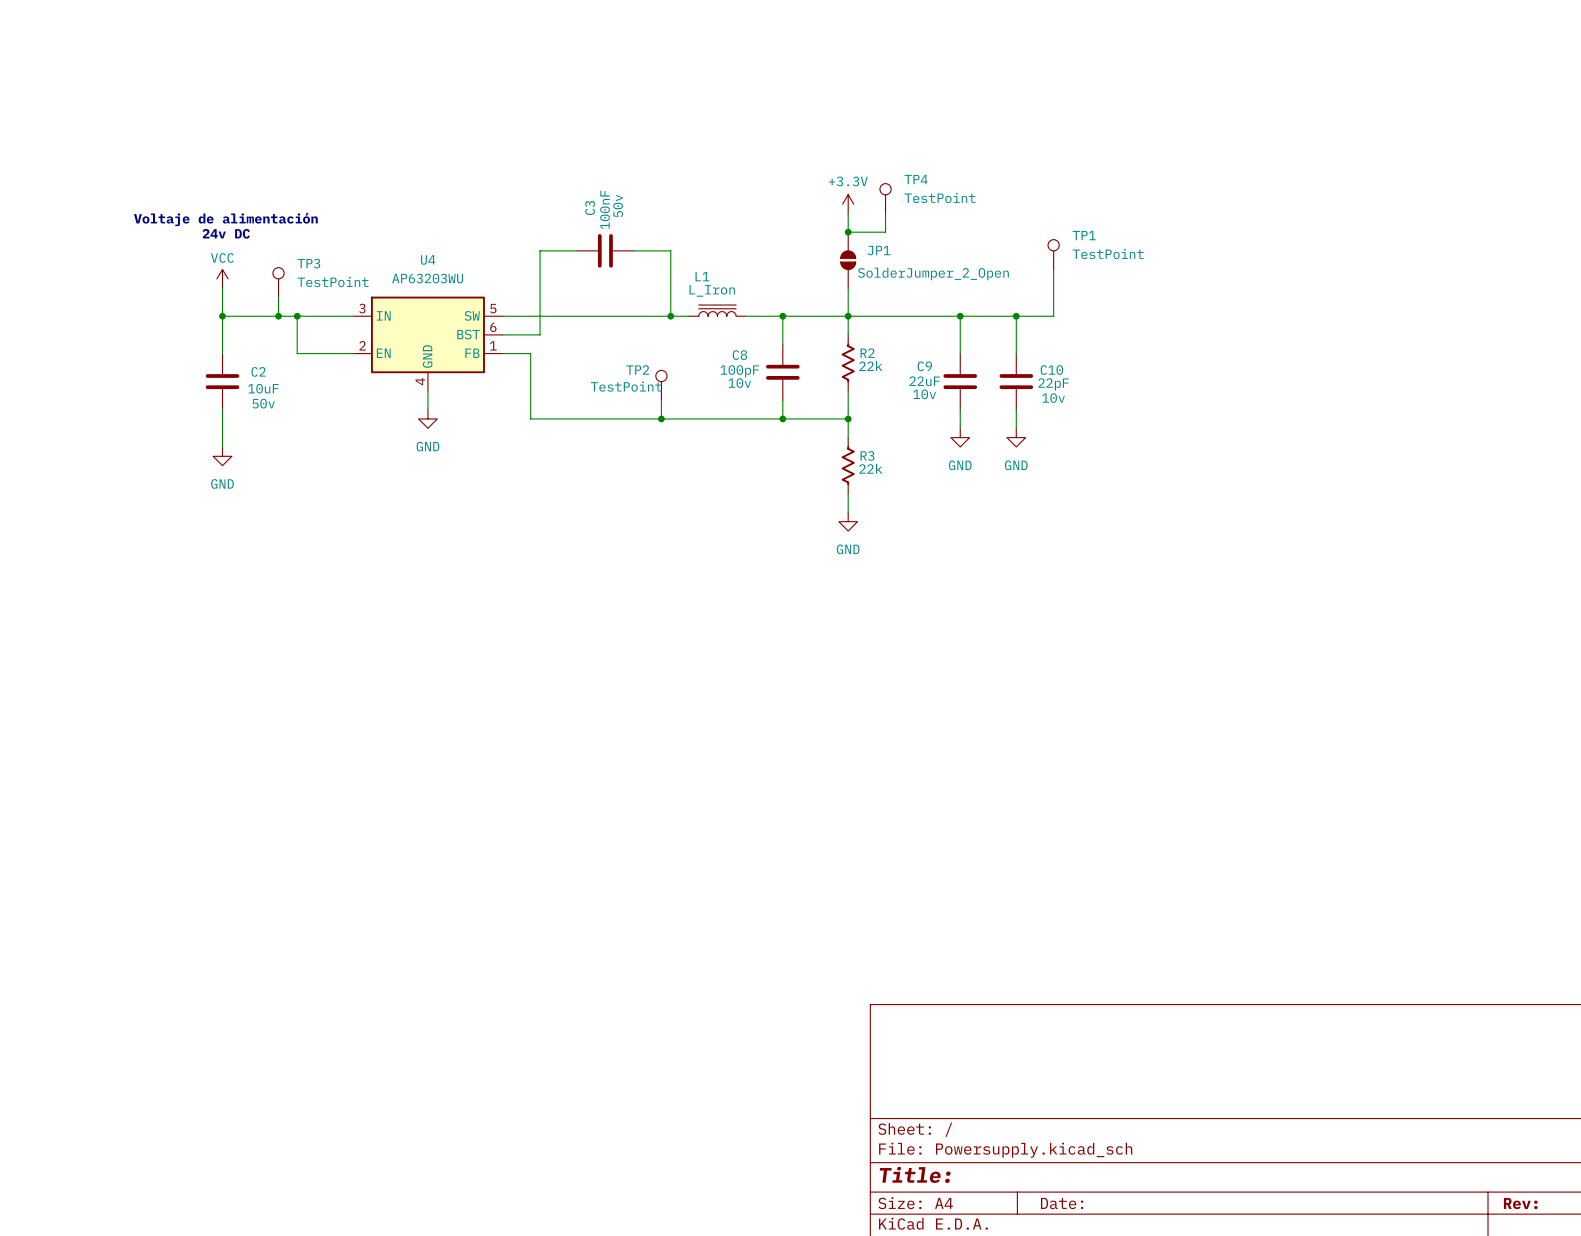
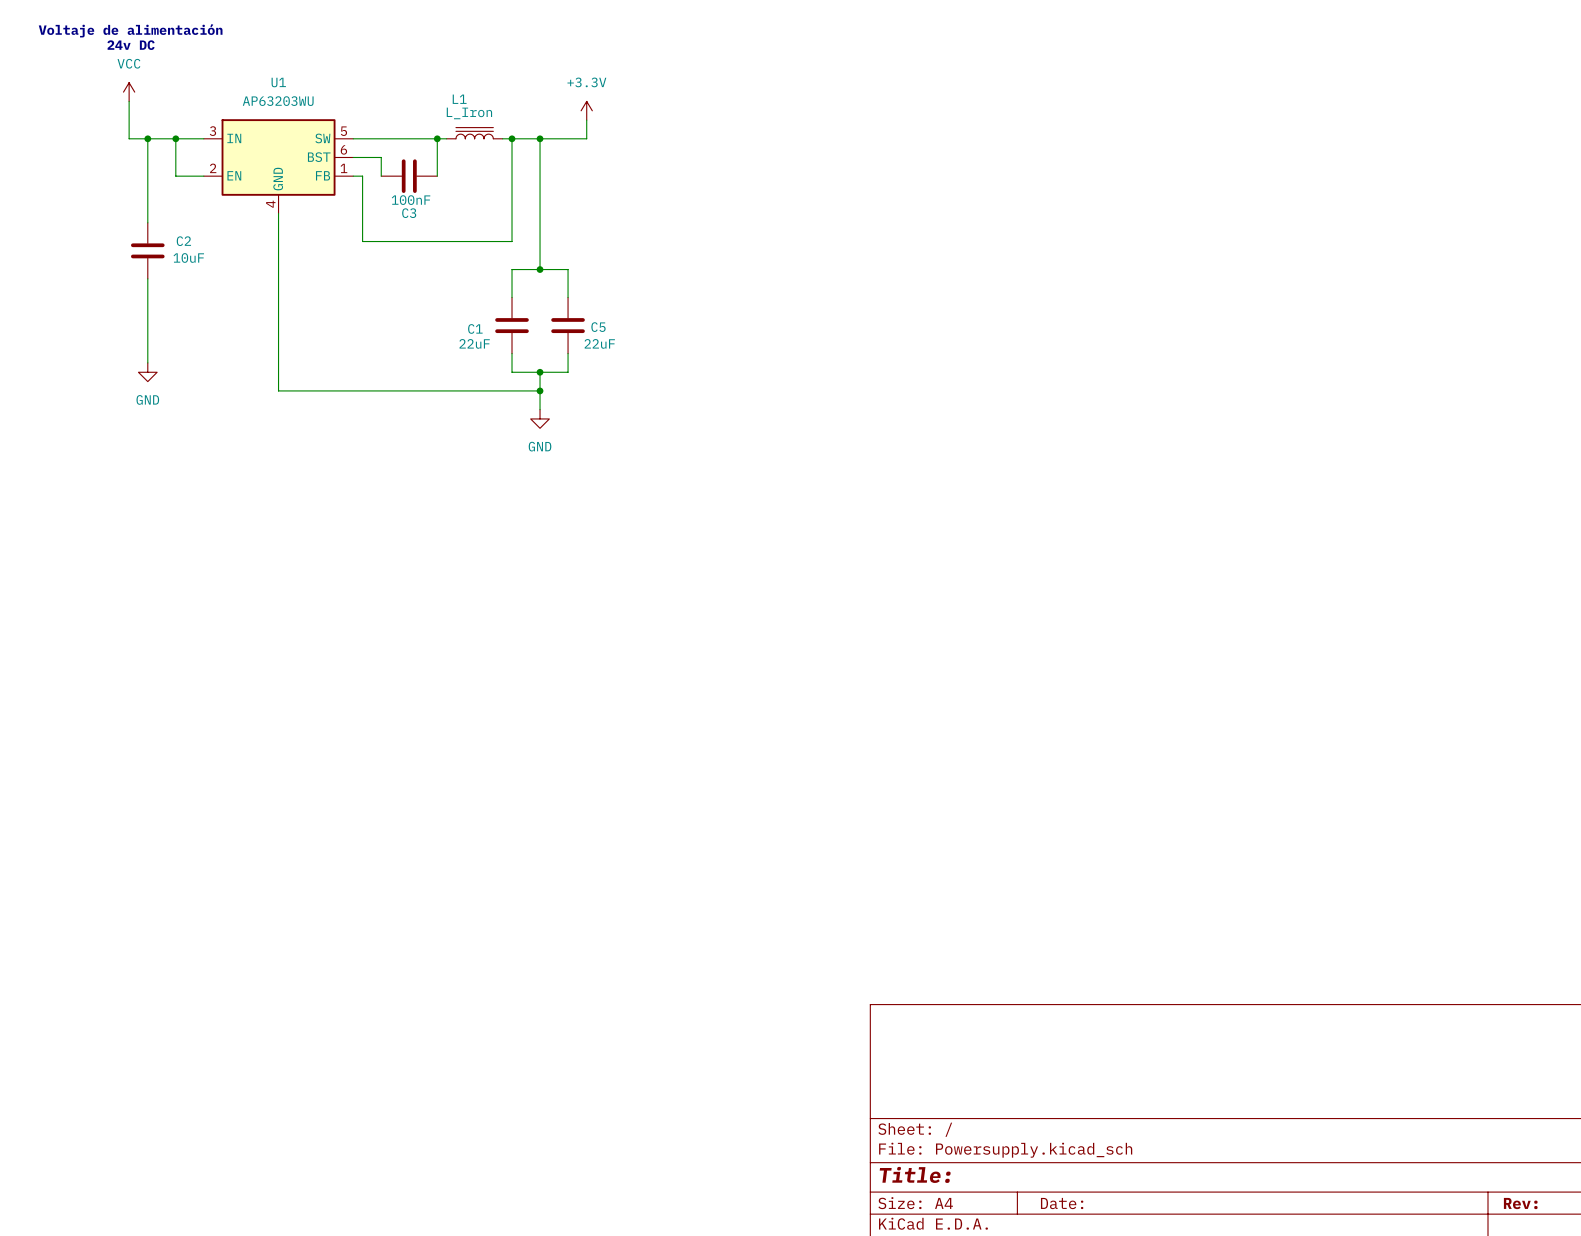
text: none -> Voltaje de alimentación (130, 30)
text: none -> 24v DC (130, 45)
power symbol: none -> VCC (129, 92)
wire: none -> (129, 101) (129, 138) (203, 138)
power symbol: none -> +3.3V (586, 110)
wire: none -> (586, 120) (586, 138) (502, 138)
wire: none -> (147, 138) (147, 222)
junction: none -> (147, 138)
wire: none -> (175, 138) (175, 176) (203, 176)
junction: none -> (175, 138)
wire: none -> (353, 138) (446, 138)
wire: none -> (437, 138) (437, 176)
junction: none -> (437, 138)
wire: none -> (512, 138) (512, 241) (362, 241) (362, 176) (353, 176)
junction: none -> (512, 138)
junction: none -> (540, 138)
wire: none -> (353, 157) (381, 157) (381, 176)
U1: none -> AP63203WU (278, 166)
TP4: TestPoint (885, 198) -> none
power symbol: +3.3V (848, 204) -> none
C3 text: 50v (618, 205) -> none
C3 name rotation: 0° (590, 207) -> 90° clockwise (409, 213)
C3 name position: C3 (590, 207) -> C3 (409, 213)
C3 text rotation: 0° (605, 209) -> 90° clockwise (411, 200)
C3 text position: 100nF (605, 209) -> 100nF (411, 200)
wire: none -> (278, 213) (278, 297)
wire: (848, 213) (848, 232) (885, 232) (885, 213) -> none
text: Voltaje de alimentación (225, 219) -> none
junction: (848, 232) -> none
text: 24v DC (226, 233) -> none
wire: (540, 250) (577, 250) -> (540, 250) (540, 138)
C3 position: (605, 250) -> (409, 176)
wire: (633, 250) (670, 250) (670, 316) -> none
TP1: TestPoint (1053, 254) -> none
JP1: SolderJumper_2_Open (848, 260) -> none
wire: (540, 269) (540, 334) (502, 334) -> none
junction: none -> (540, 269)
wire: (1053, 269) (1053, 316) (745, 316) -> none
wire: none -> (147, 278) (147, 362)
power symbol: VCC (222, 278) -> none
TP3: TestPoint (278, 282) -> none
wire: (222, 288) (222, 353) -> none
wire: (848, 288) (848, 334) -> none
wire: none -> (512, 297) (512, 269) (568, 269) (568, 297)
L1 position: (717, 310) -> (474, 133)
wire: (222, 316) (353, 316) -> none
junction: (222, 316) -> none
wire: none -> (278, 316) (278, 390) (540, 390)
junction: (278, 316) -> none
wire: (297, 316) (297, 353) (353, 353) -> none
junction: (297, 316) -> none
wire: (502, 316) (689, 316) -> none
junction: (670, 316) -> none
wire: (782, 316) (782, 344) -> none
junction: (782, 316) -> none
junction: (848, 316) -> none
wire: (960, 316) (960, 353) -> none
junction: (960, 316) -> none
wire: (1016, 316) (1016, 353) -> none
junction: (1016, 316) -> none
C1: none -> (512, 325)
C5: none -> (568, 325)
U4: AP63203WU (427, 343) -> none
wire: (502, 353) (530, 353) (530, 418) (848, 418) -> none
wire: none -> (512, 353) (512, 372) (568, 372) (568, 353)
R2: (848, 362) -> none
wire: none -> (540, 372) (540, 409)
junction: none -> (540, 372)
C8: (782, 372) -> none
C2 position: (222, 381) -> (147, 250)
C9: (960, 381) -> none
C10: (1016, 381) -> none
TP2: TestPoint (661, 385) -> none
wire: (427, 390) (427, 409) -> none
junction: none -> (540, 390)
wire: (848, 390) (848, 437) -> none
wire: (661, 400) (661, 418) -> none
wire: (782, 400) (782, 418) -> none
C2 text: 50v (263, 403) -> none
wire: (222, 409) (222, 446) -> none
wire: (960, 409) (960, 428) -> none
wire: (1016, 409) (1016, 428) -> none
power symbol position: GND (427, 418) -> GND (540, 418)
junction: (661, 418) -> none
junction: (782, 418) -> none
junction: (848, 418) -> none
power symbol: GND (960, 437) -> none
power symbol: GND (1016, 437) -> none
power symbol position: GND (222, 456) -> GND (147, 372)
R3: (848, 465) -> none
wire: (848, 493) (848, 512) -> none
power symbol: GND (848, 521) -> none

